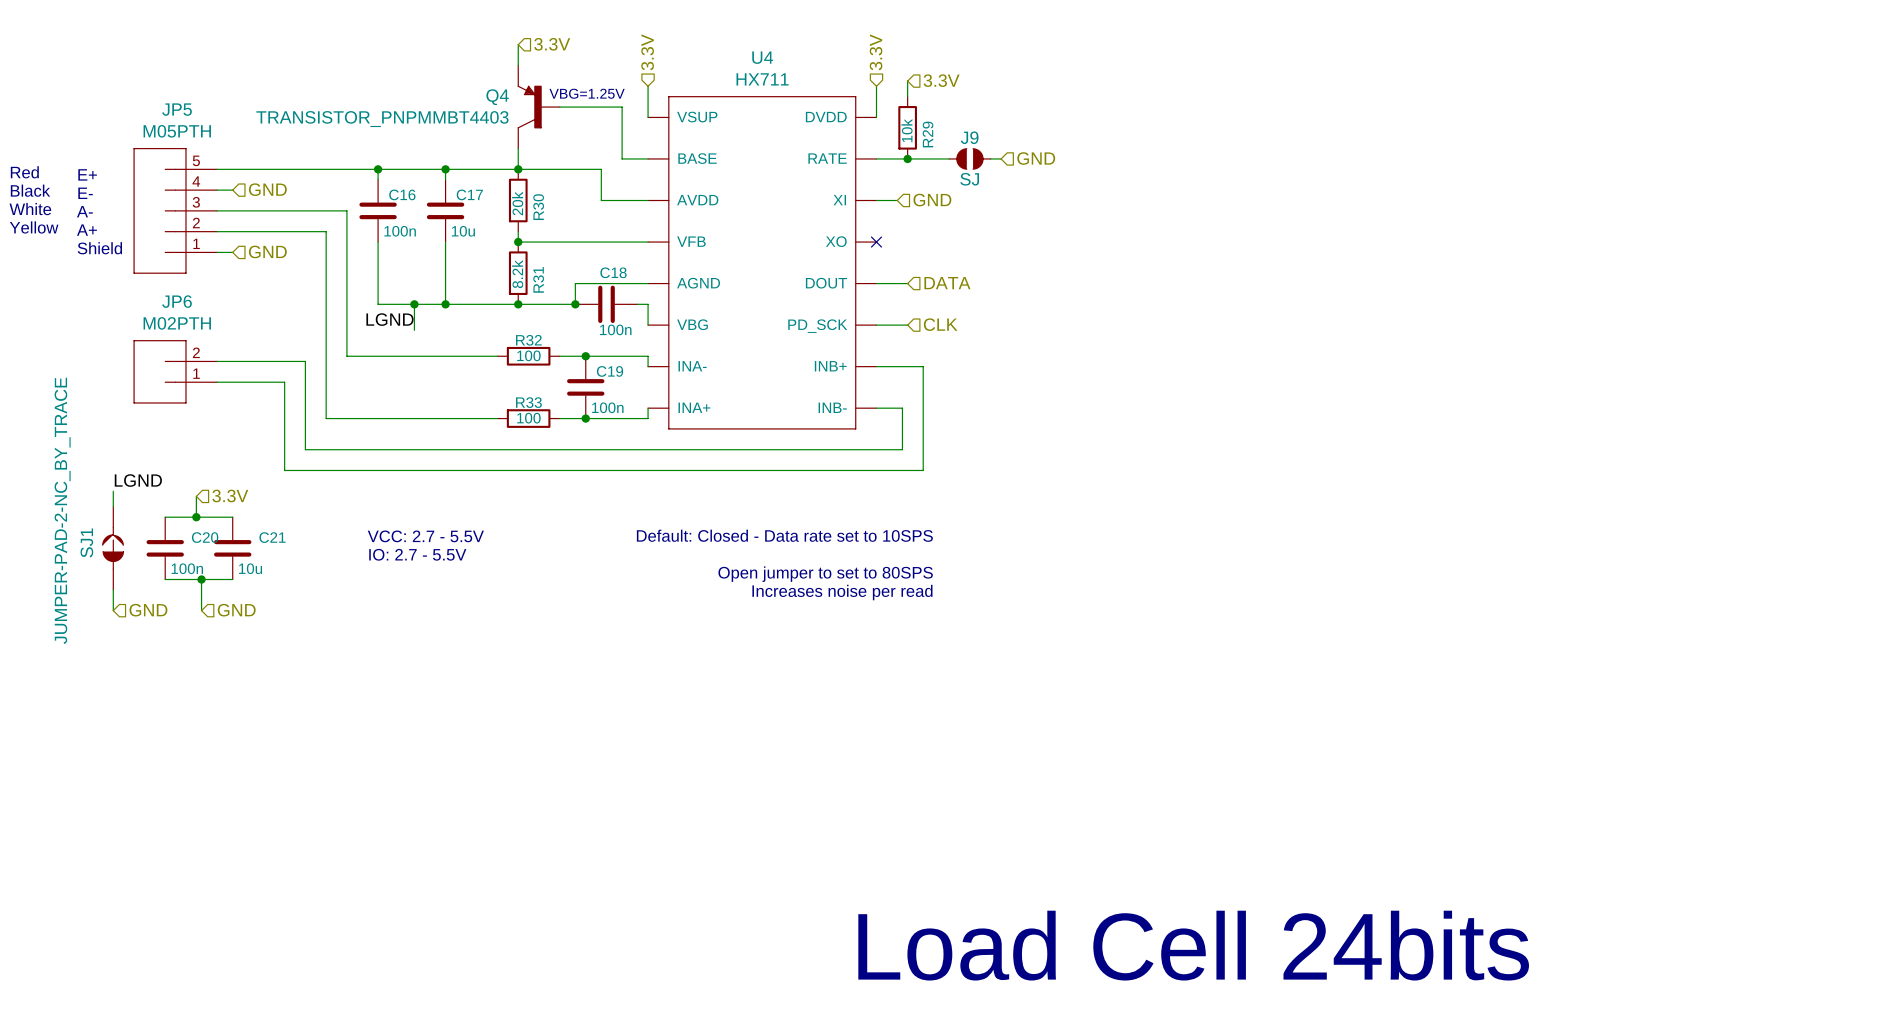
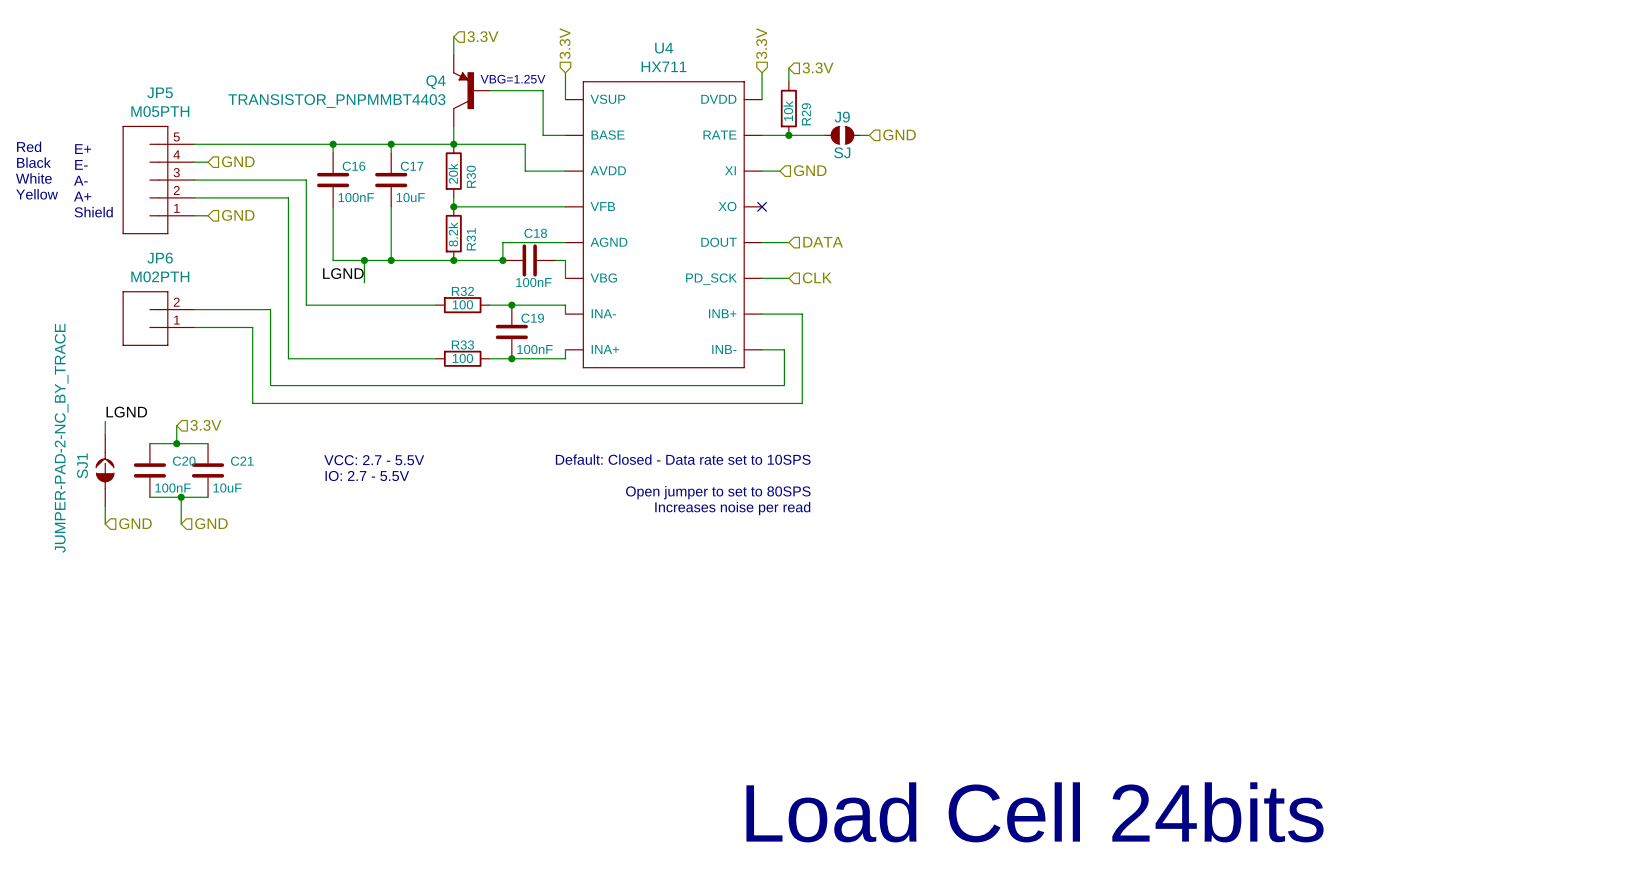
C16 value: 100n (400, 231) -> 100nF (356, 197)
C17 value: 10u (463, 231) -> 10uF (410, 197)
C18 value: 100n (615, 329) -> 100nF (533, 282)
C19 value: 100n (607, 407) -> 100nF (534, 349)
C20 value: 100n (187, 568) -> 100nF (173, 488)
C21 value: 10u (250, 568) -> 10uF (227, 488)

